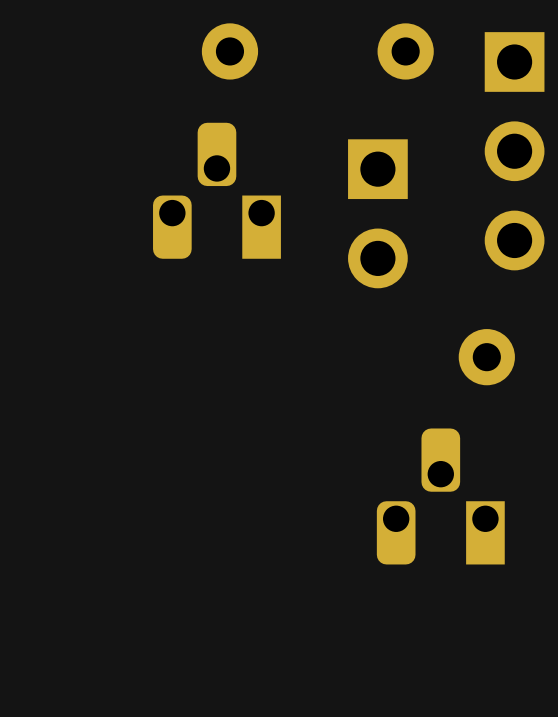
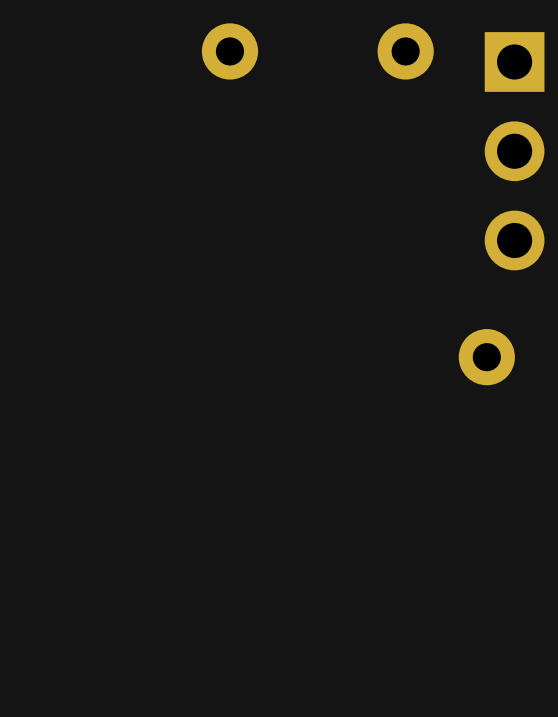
part: (216, 190) -> none
part: (377, 213) -> none
part: (440, 496) -> none

